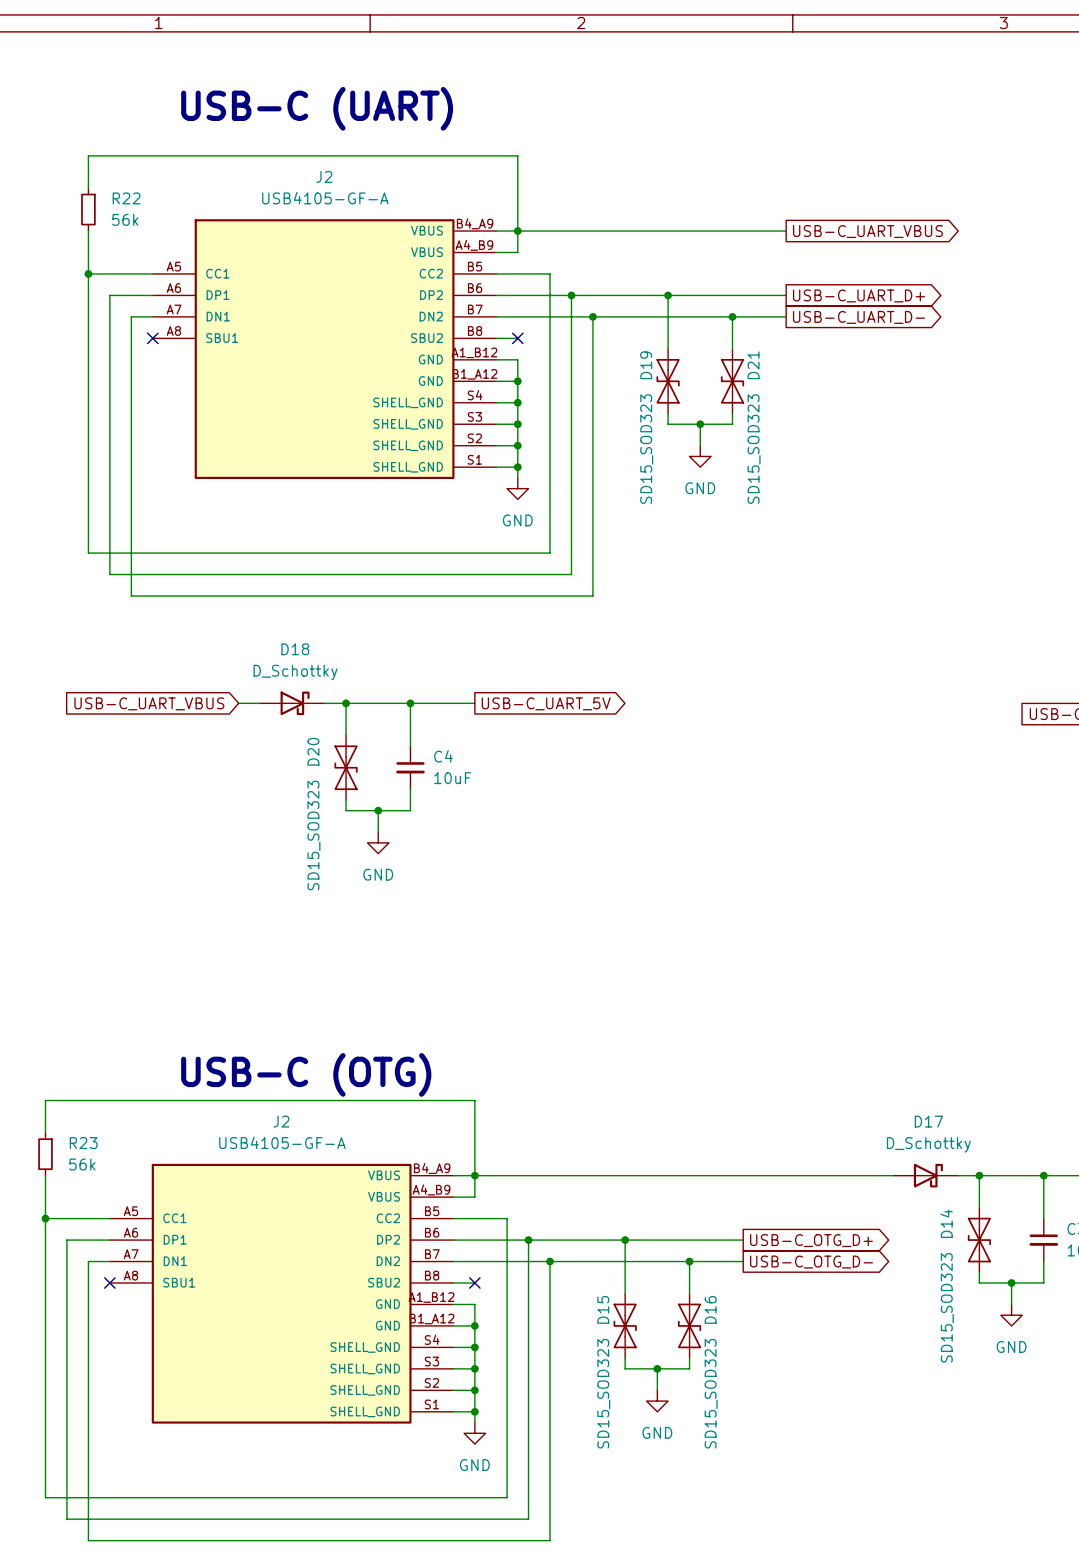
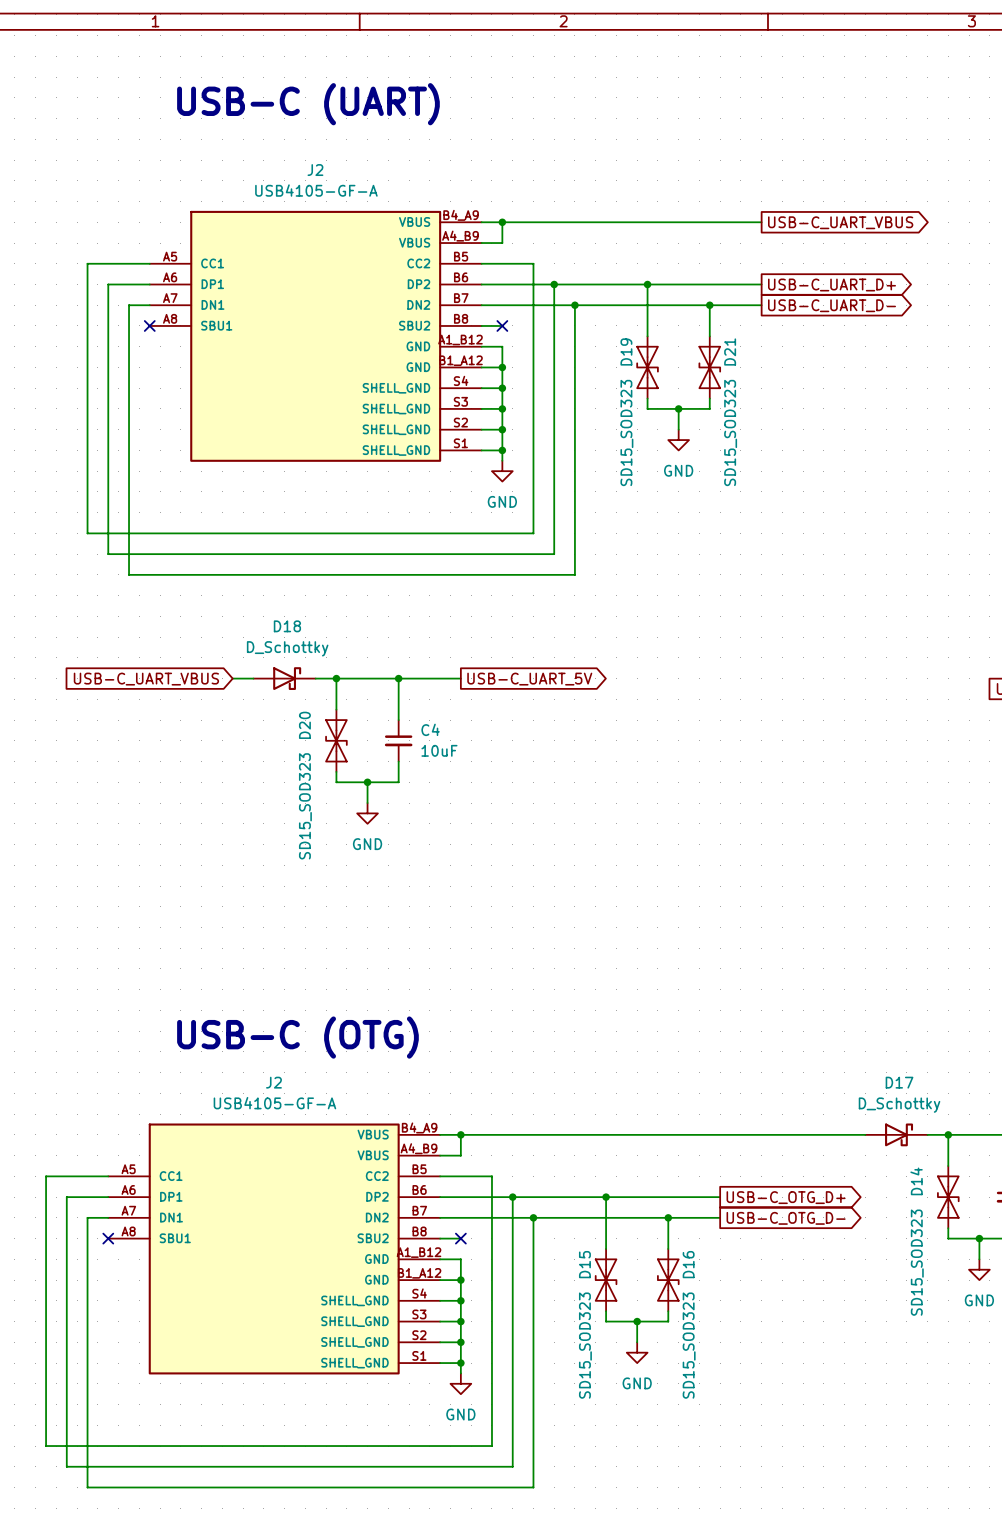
wire: (88, 188) (88, 155) (517, 155) (517, 231) -> none
R22: 56k (88, 209) -> none
wire: (88, 231) (88, 273) -> none
junction: (88, 273) -> none
wire: (45, 1132) (45, 1100) (474, 1100) (474, 1175) -> none
R23: 56k (45, 1154) -> none
wire: (45, 1175) (45, 1218) -> none
junction: (45, 1218) -> none

